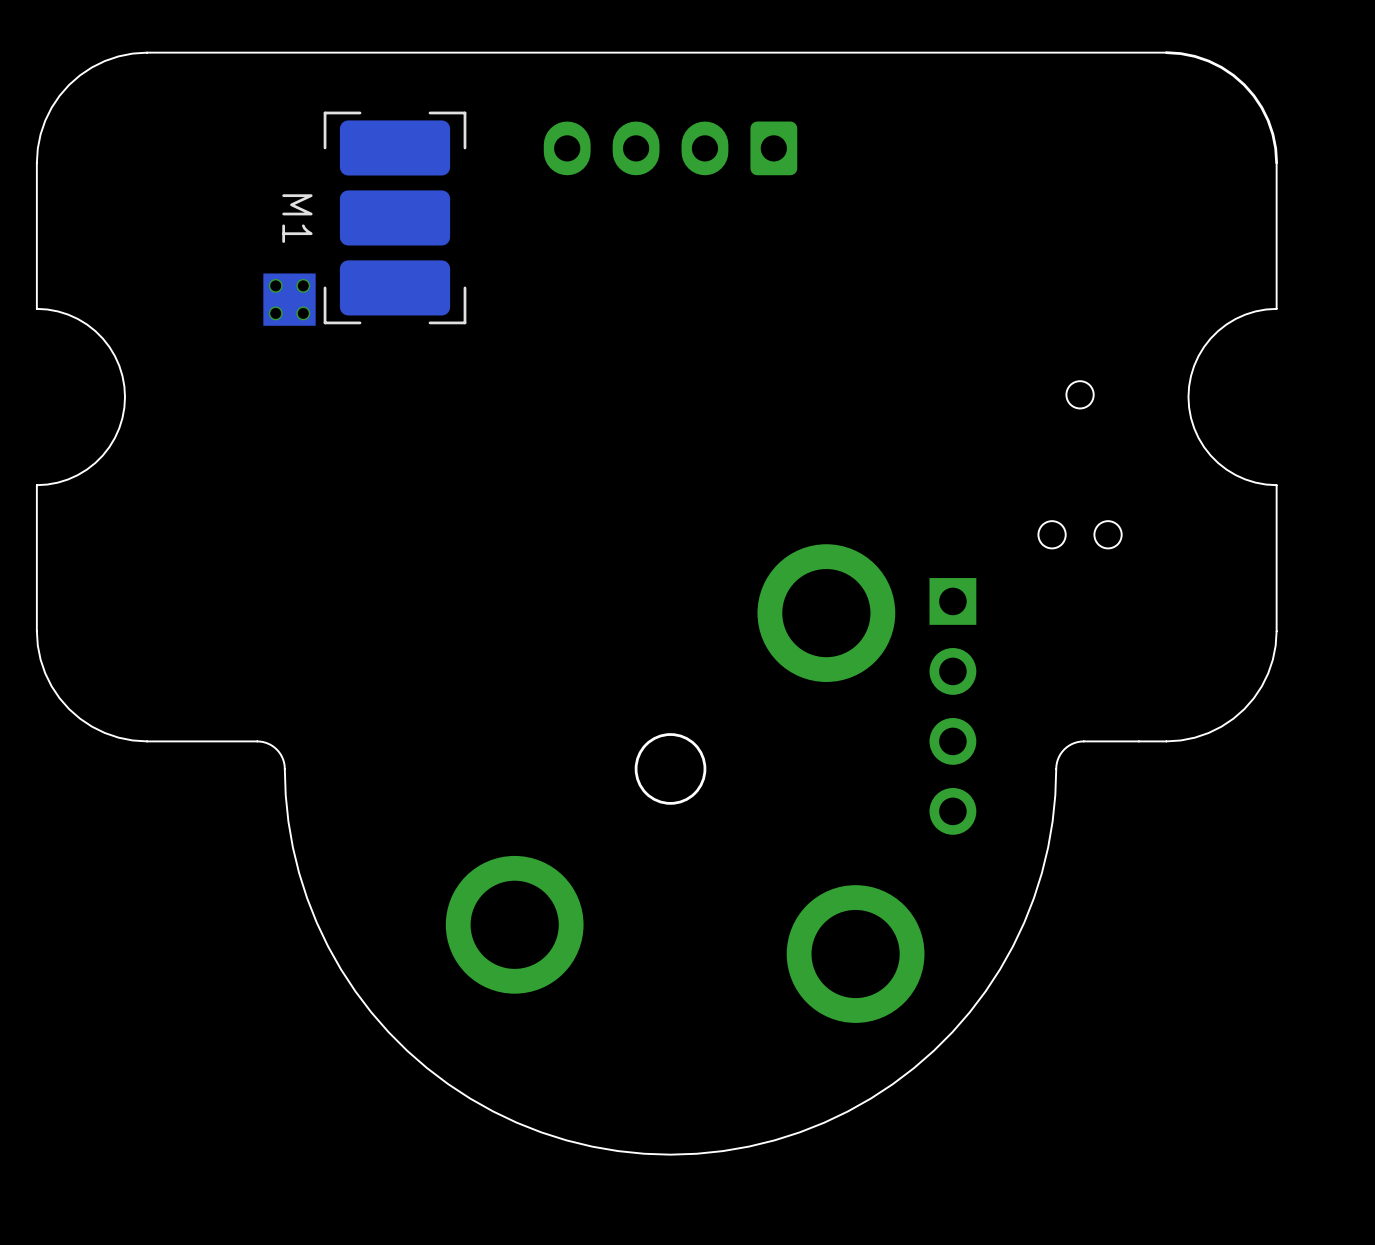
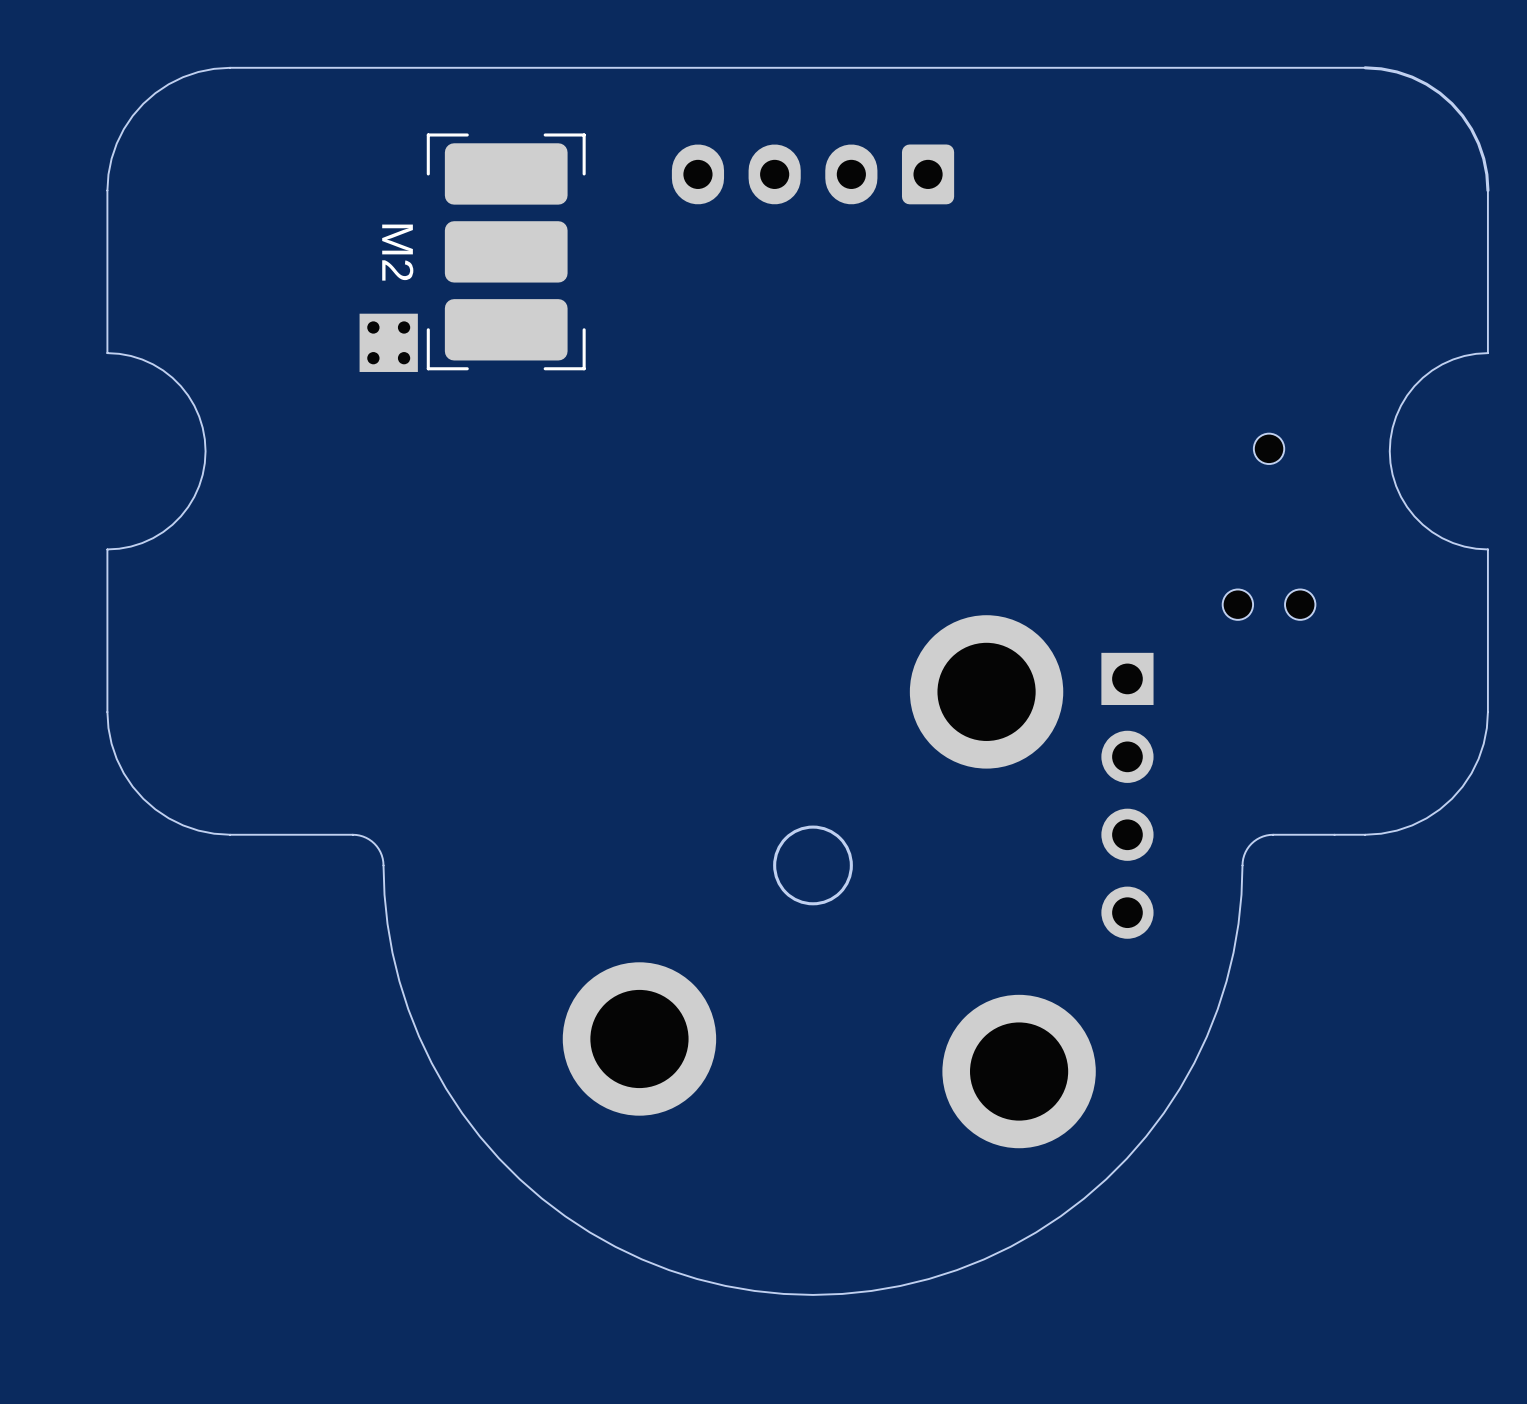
M1 name: M1 (297, 218) -> M2 (397, 252)

